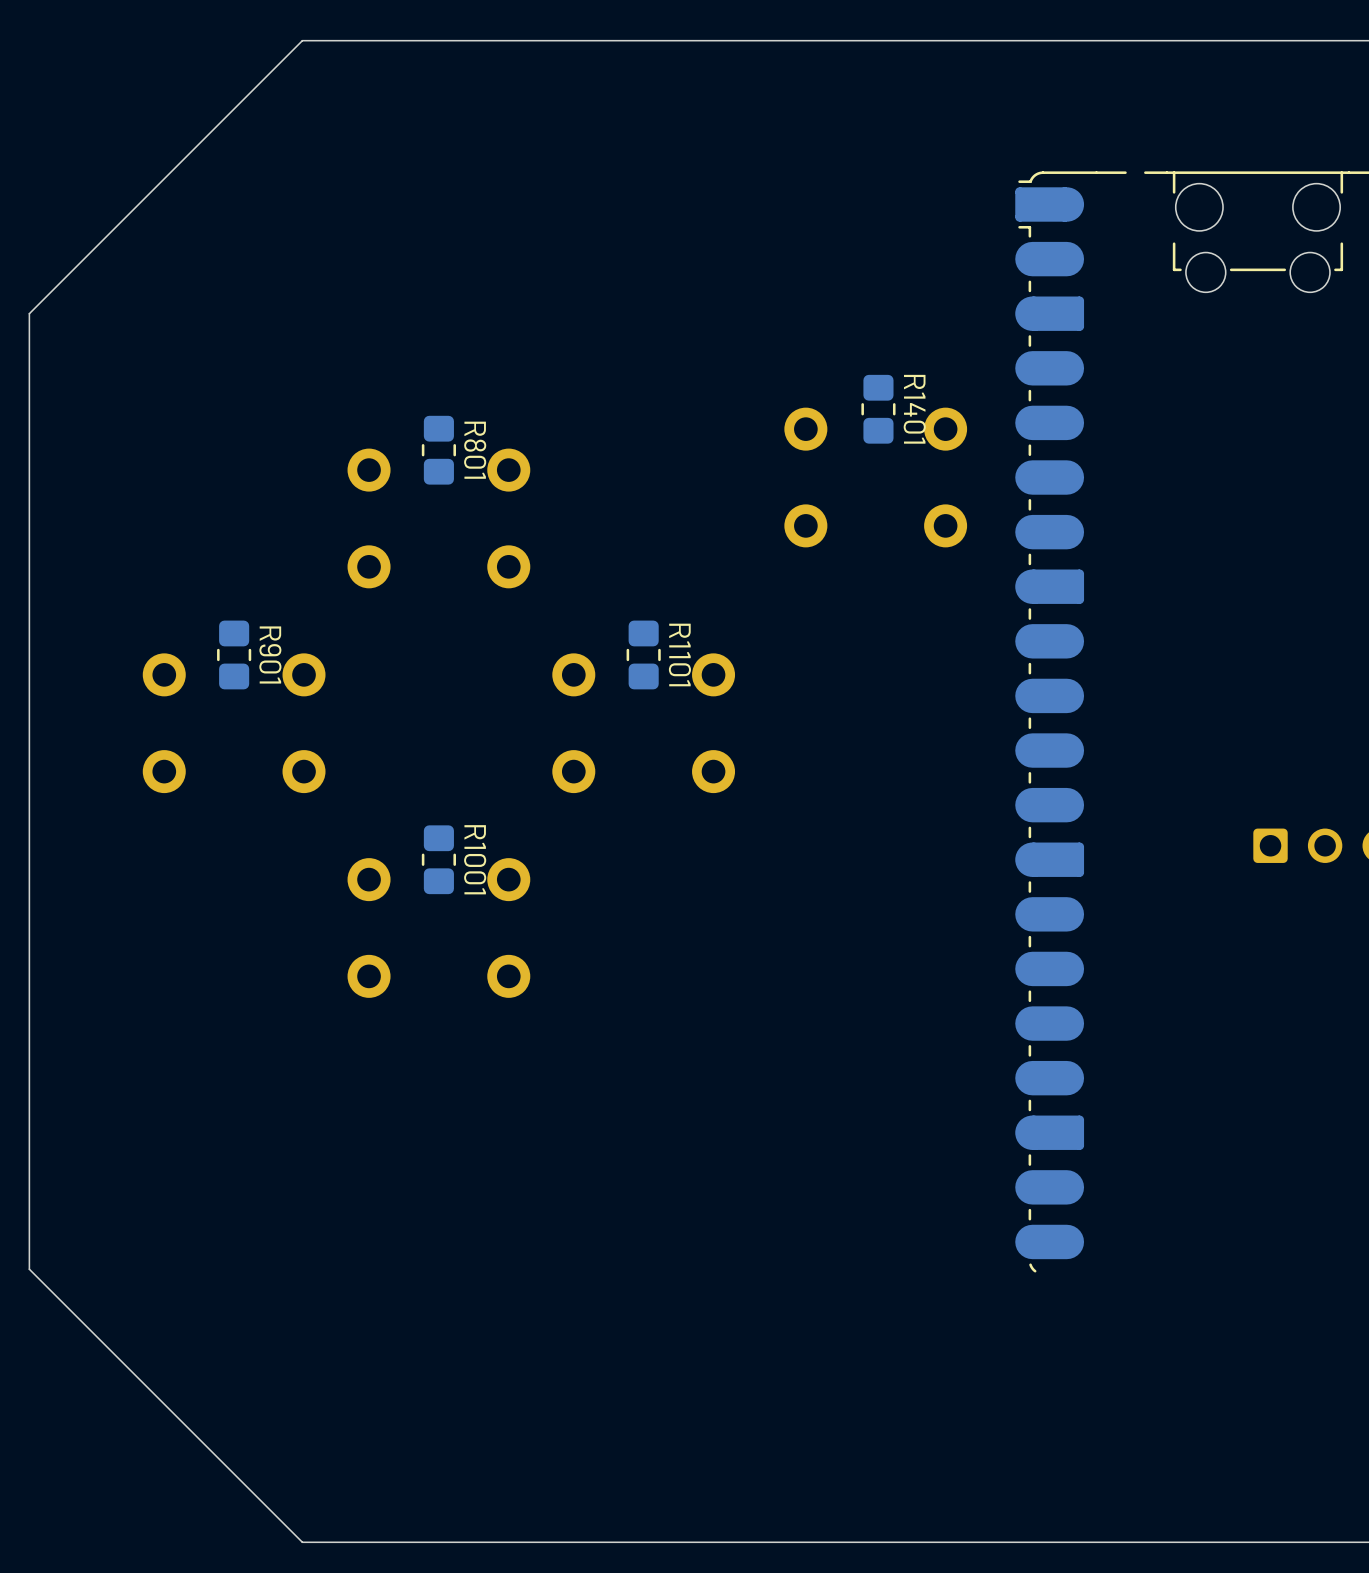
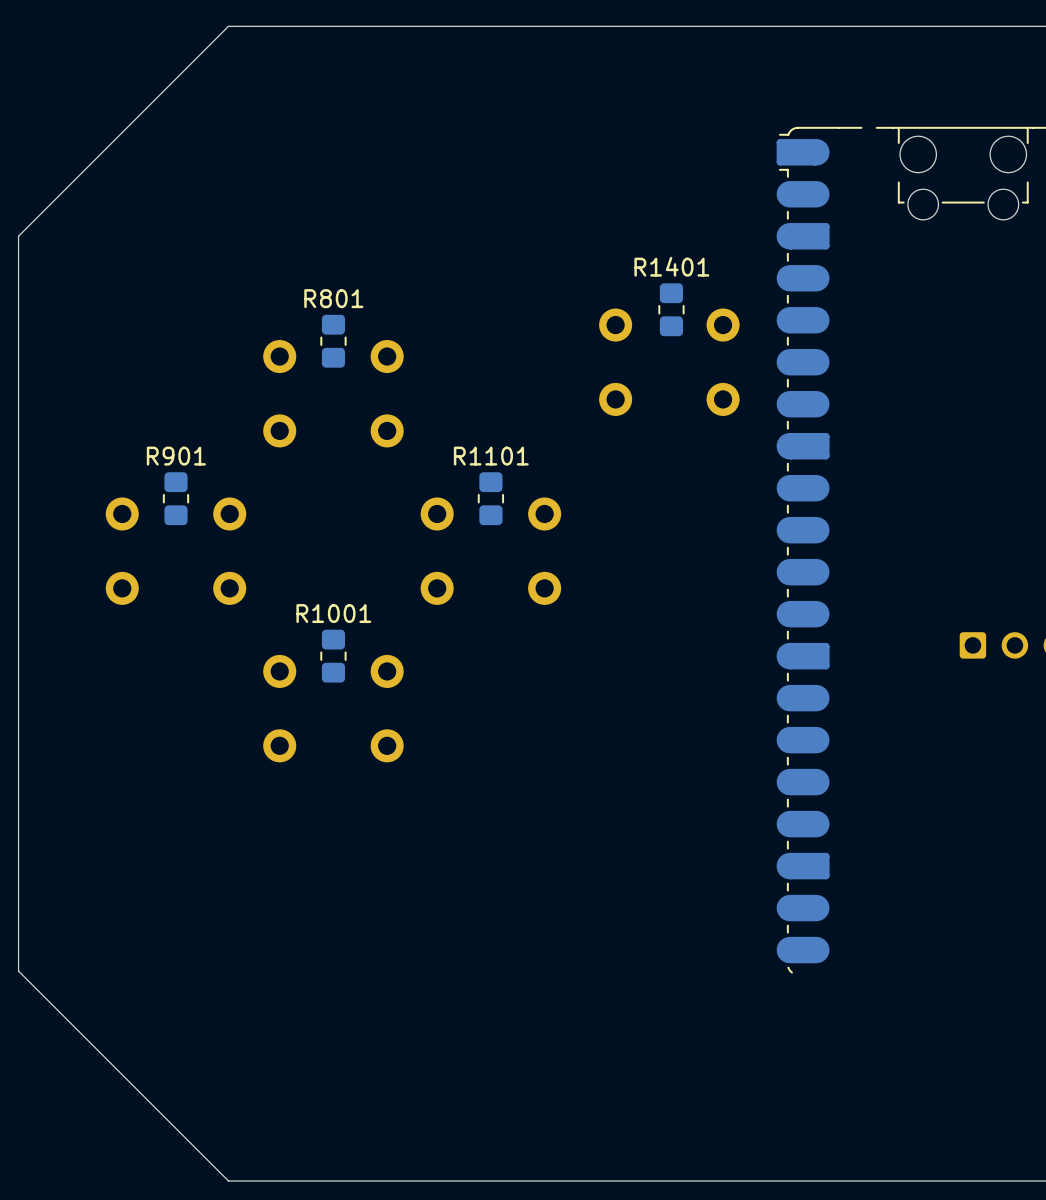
R1401 name rotation: 0° (914, 409) -> 90° counterclockwise (671, 266)
R801 name rotation: 0° (475, 450) -> 90° counterclockwise (333, 298)
R901 name rotation: 0° (270, 654) -> 90° counterclockwise (176, 456)
R1101 name rotation: 0° (679, 654) -> 90° counterclockwise (491, 456)
R1001 name rotation: 0° (475, 859) -> 90° counterclockwise (333, 613)

